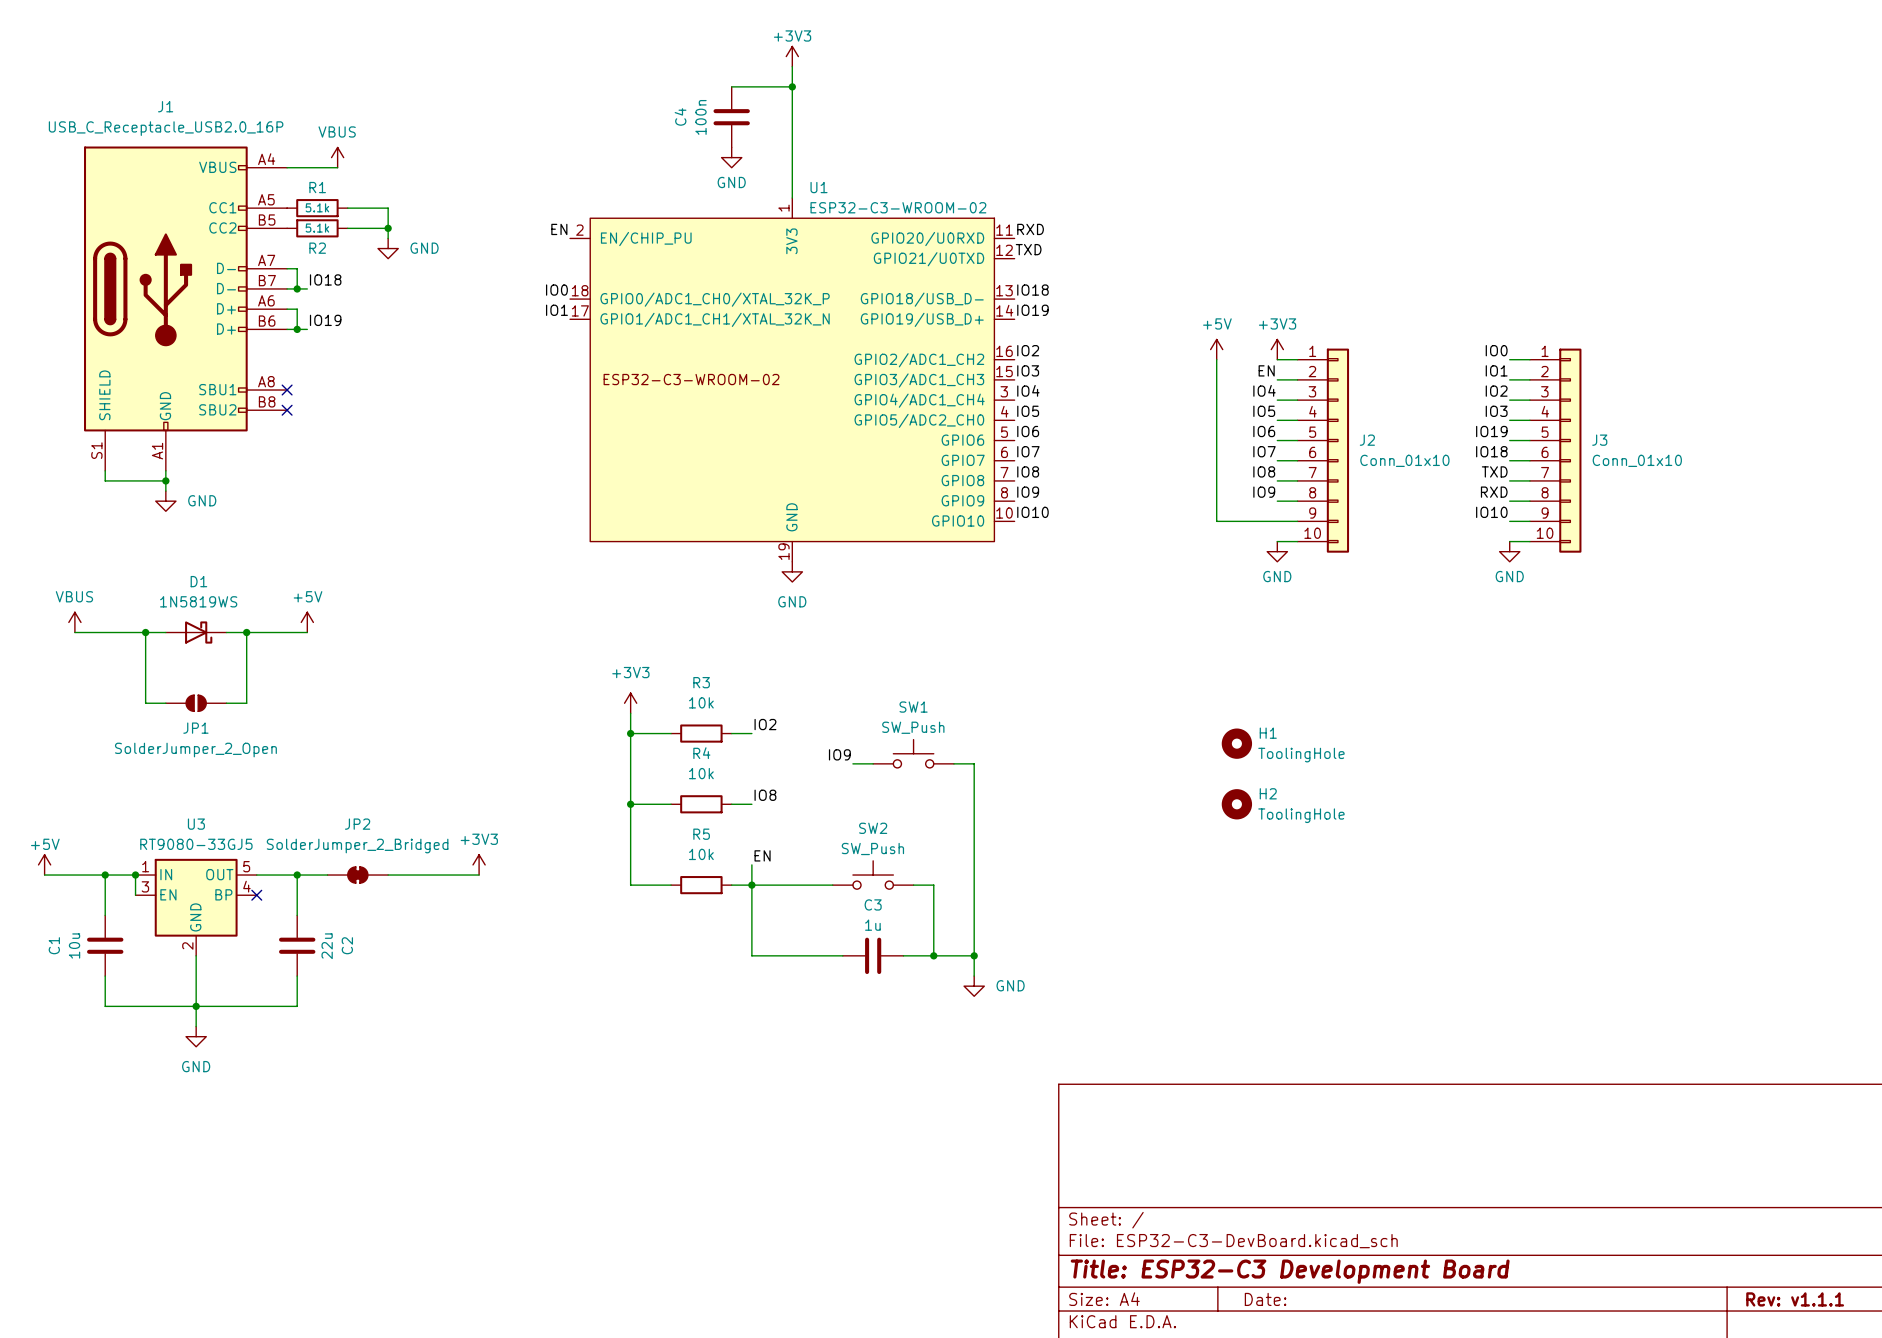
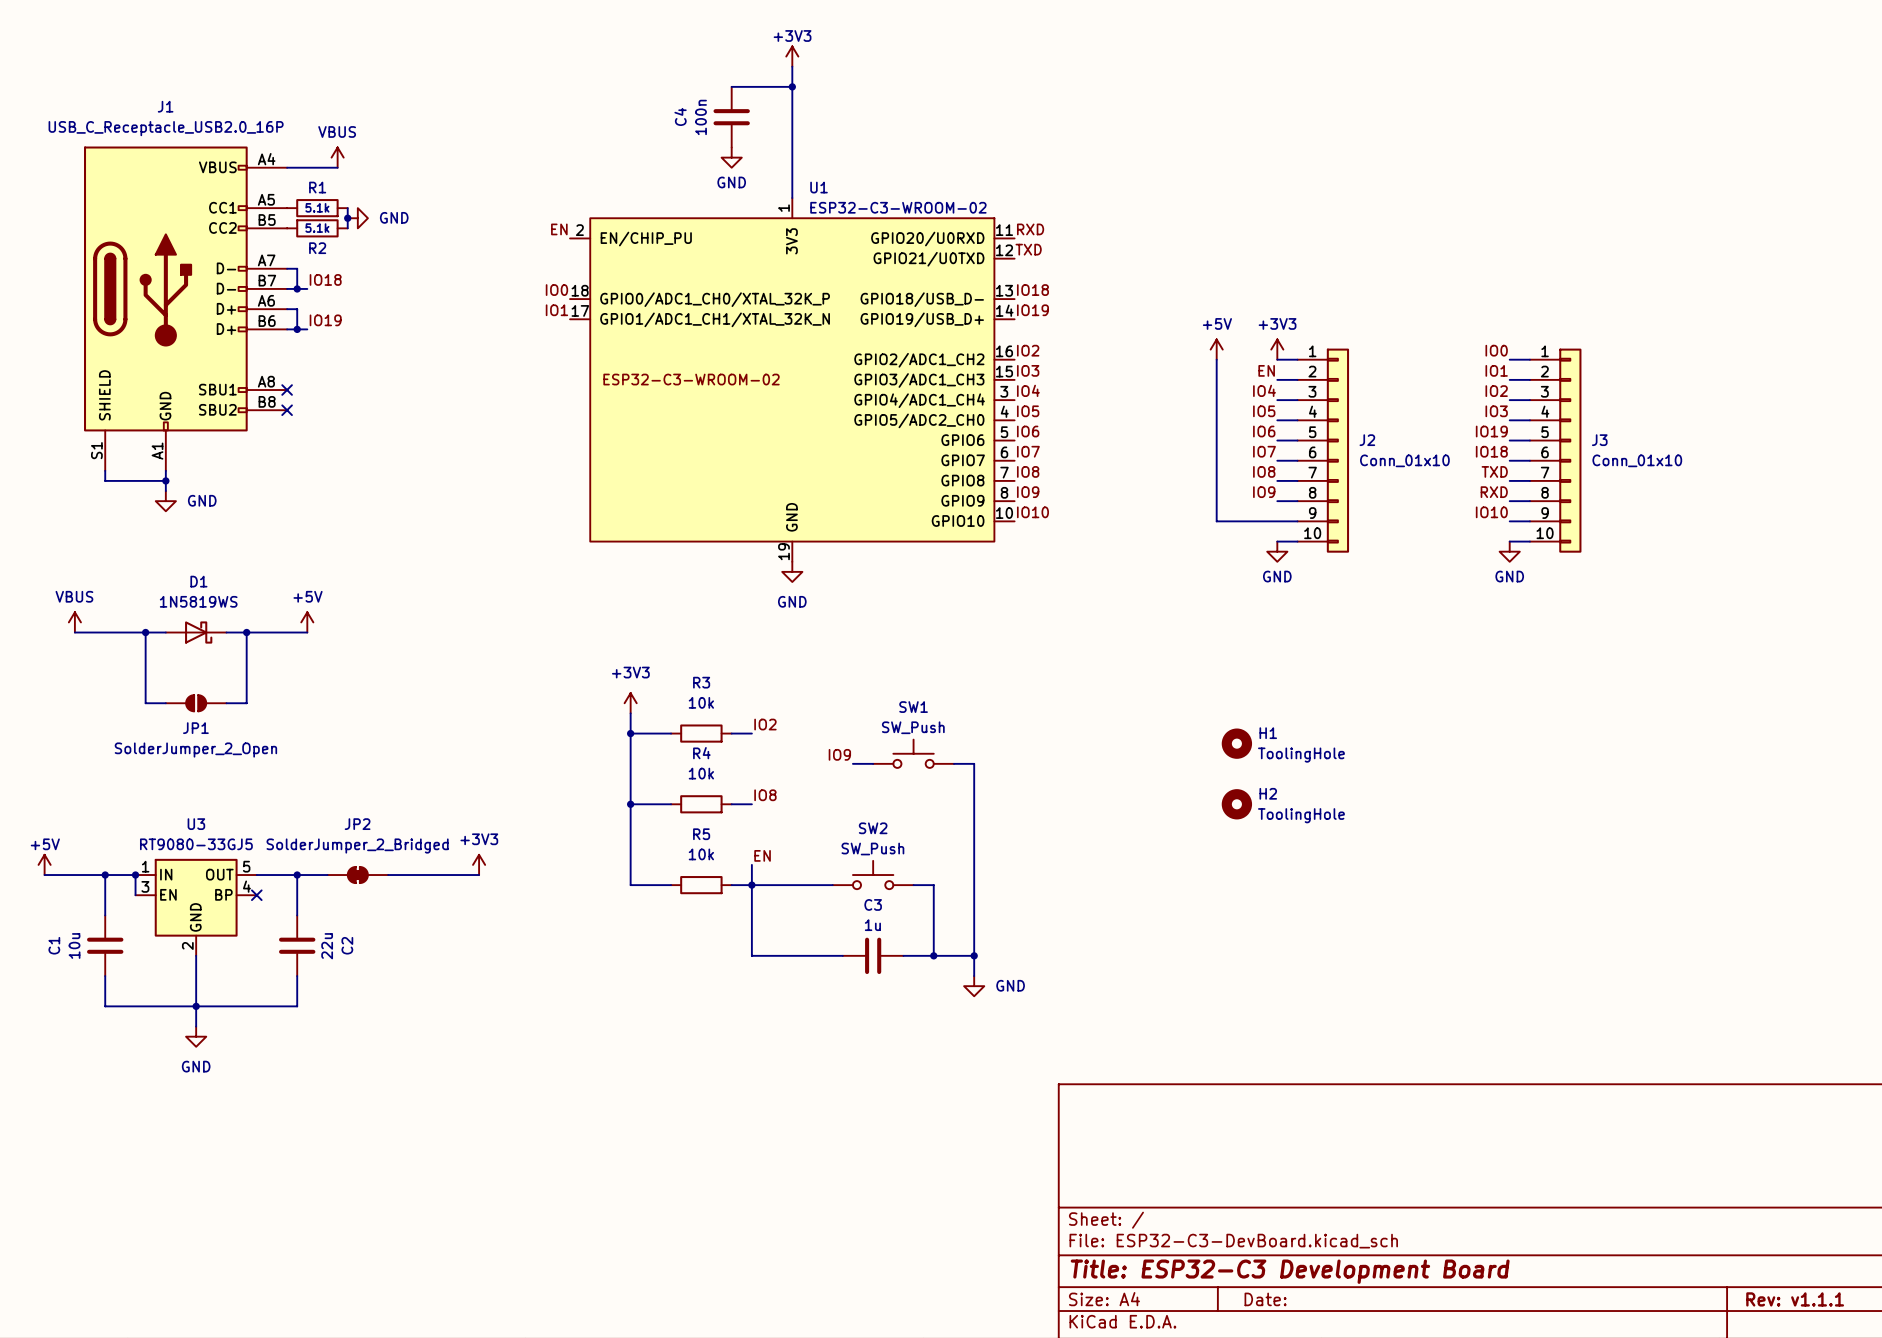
wire: (347, 208) (388, 208) (388, 238) -> (347, 208) (347, 228)
wire: (347, 228) (388, 228) -> none
junction position: (388, 228) -> (347, 218)
power symbol rotation: 0° (388, 248) -> 90° counterclockwise (357, 218)
power symbol position: GND (388, 248) -> GND (357, 218)

